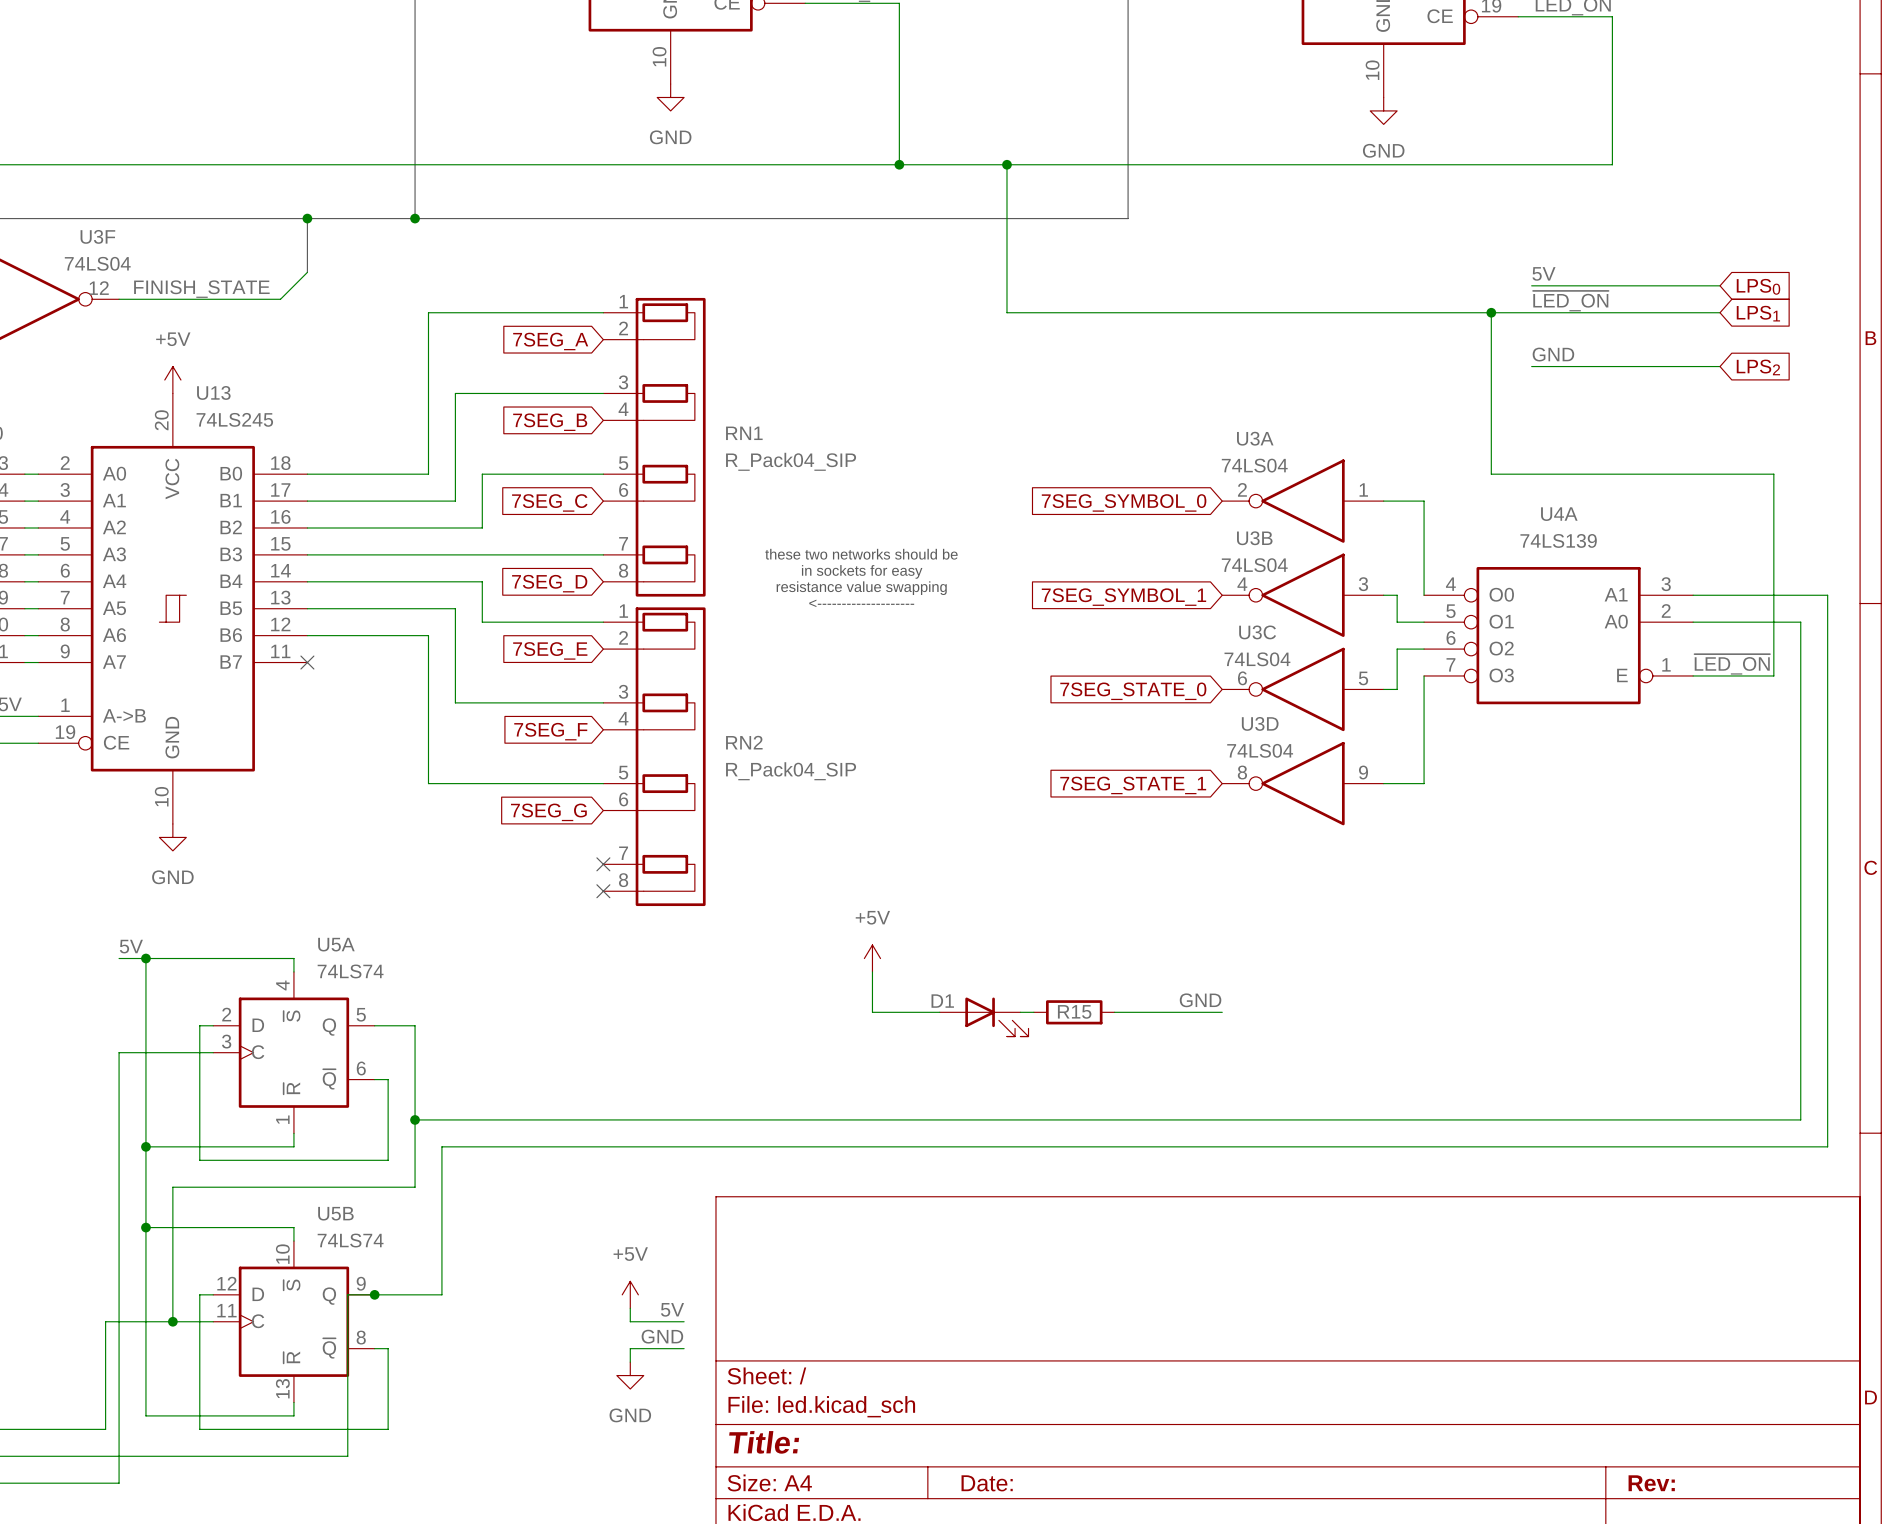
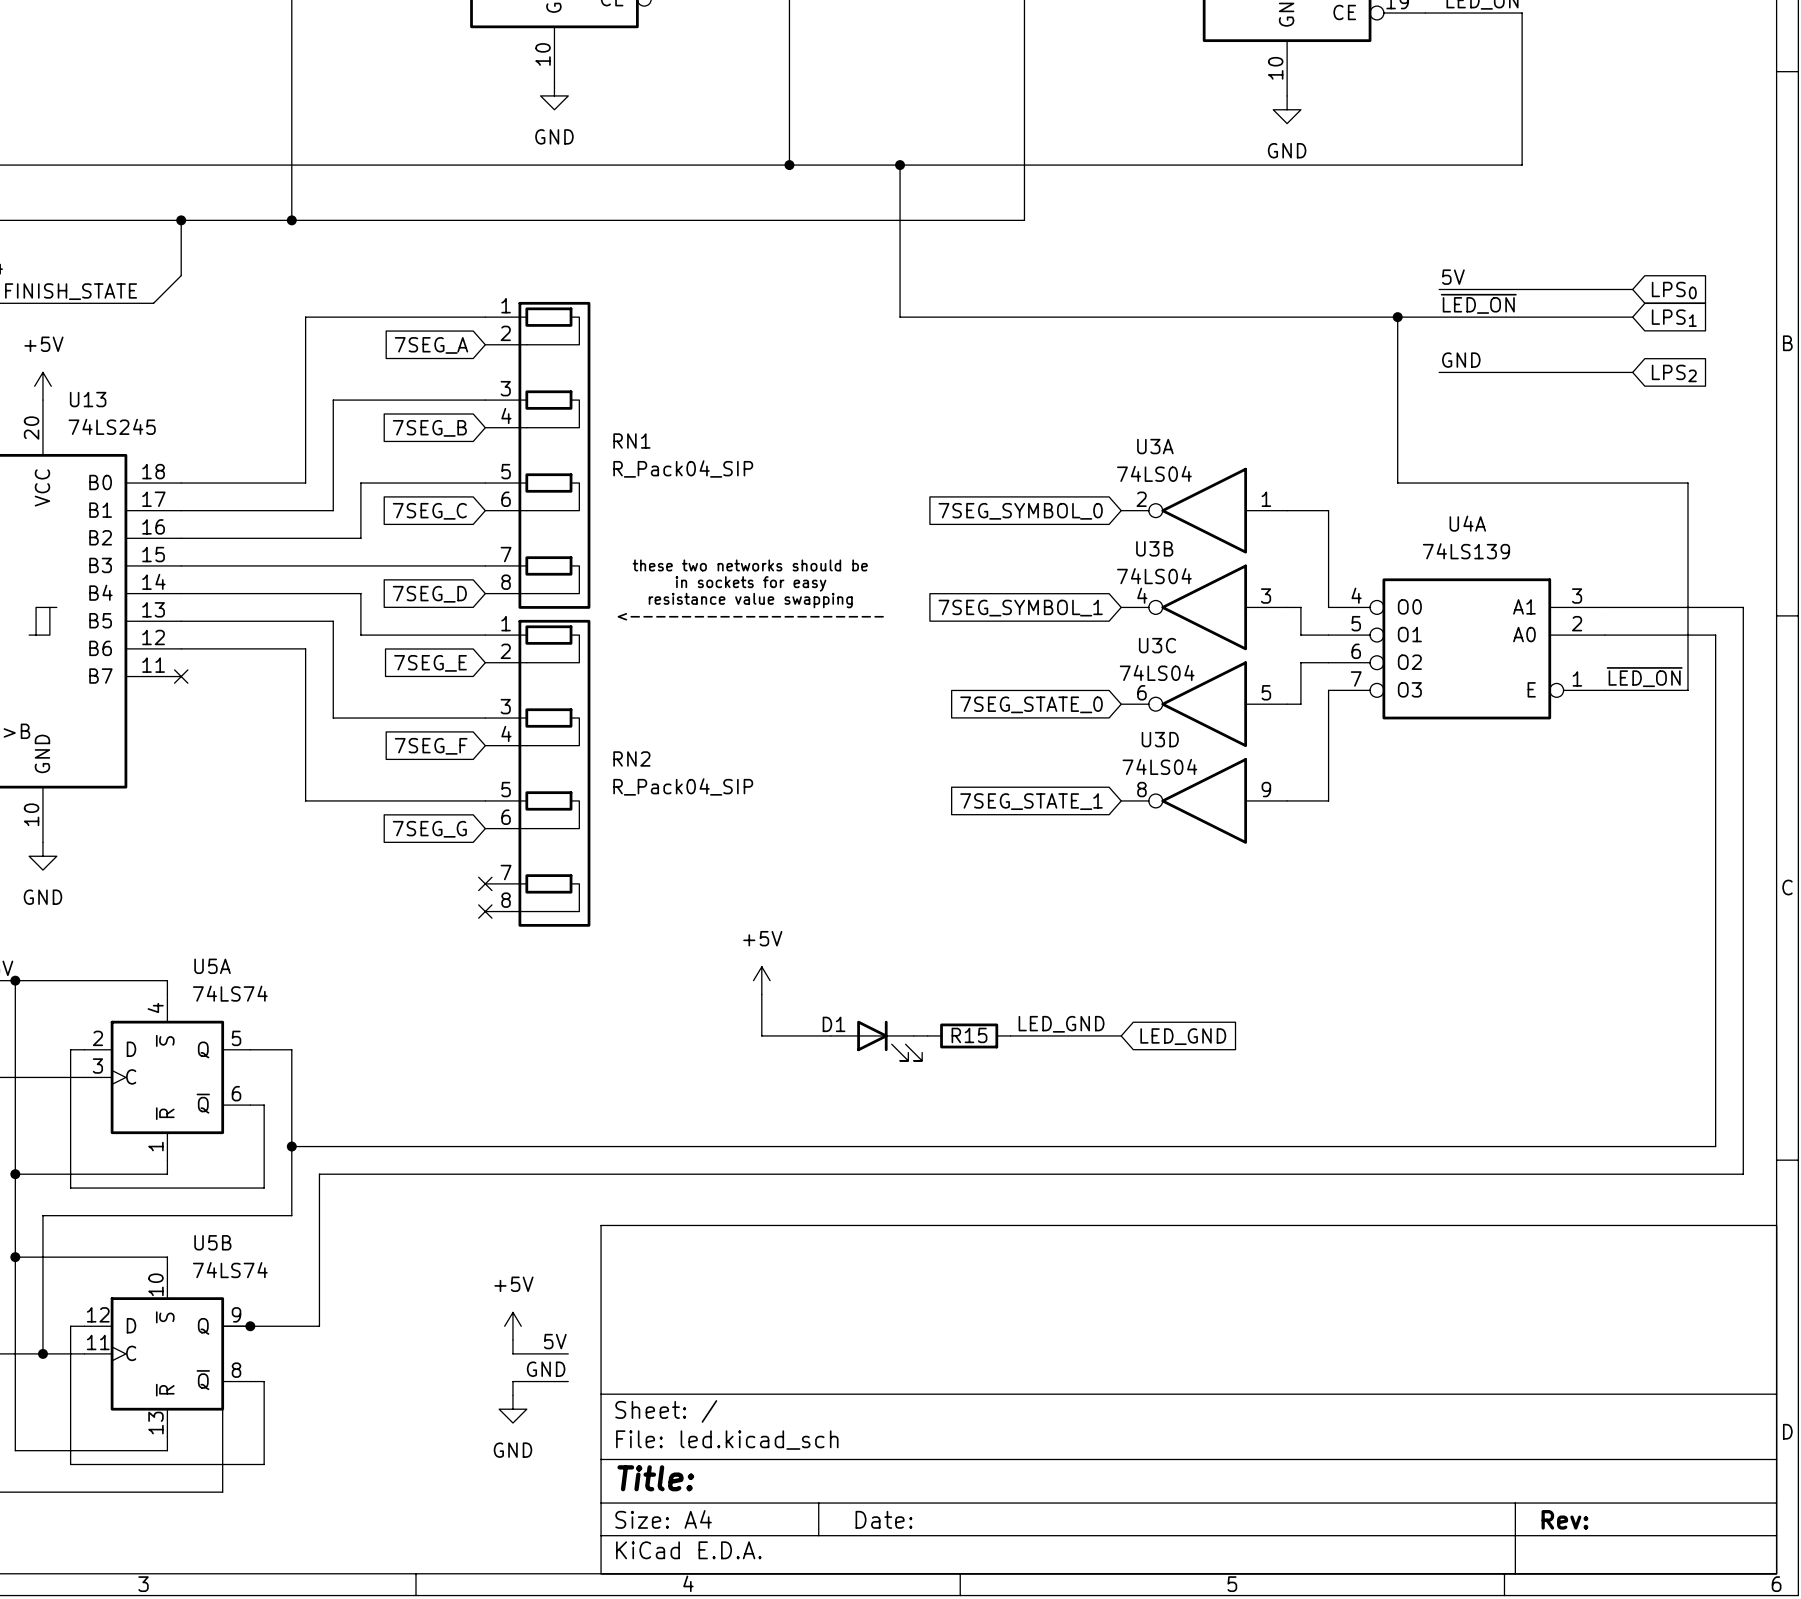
label: GND (1200, 1000) -> none
label: none -> LED_GND (1061, 1024)
global label: none -> LED_GND (1183, 1036)

